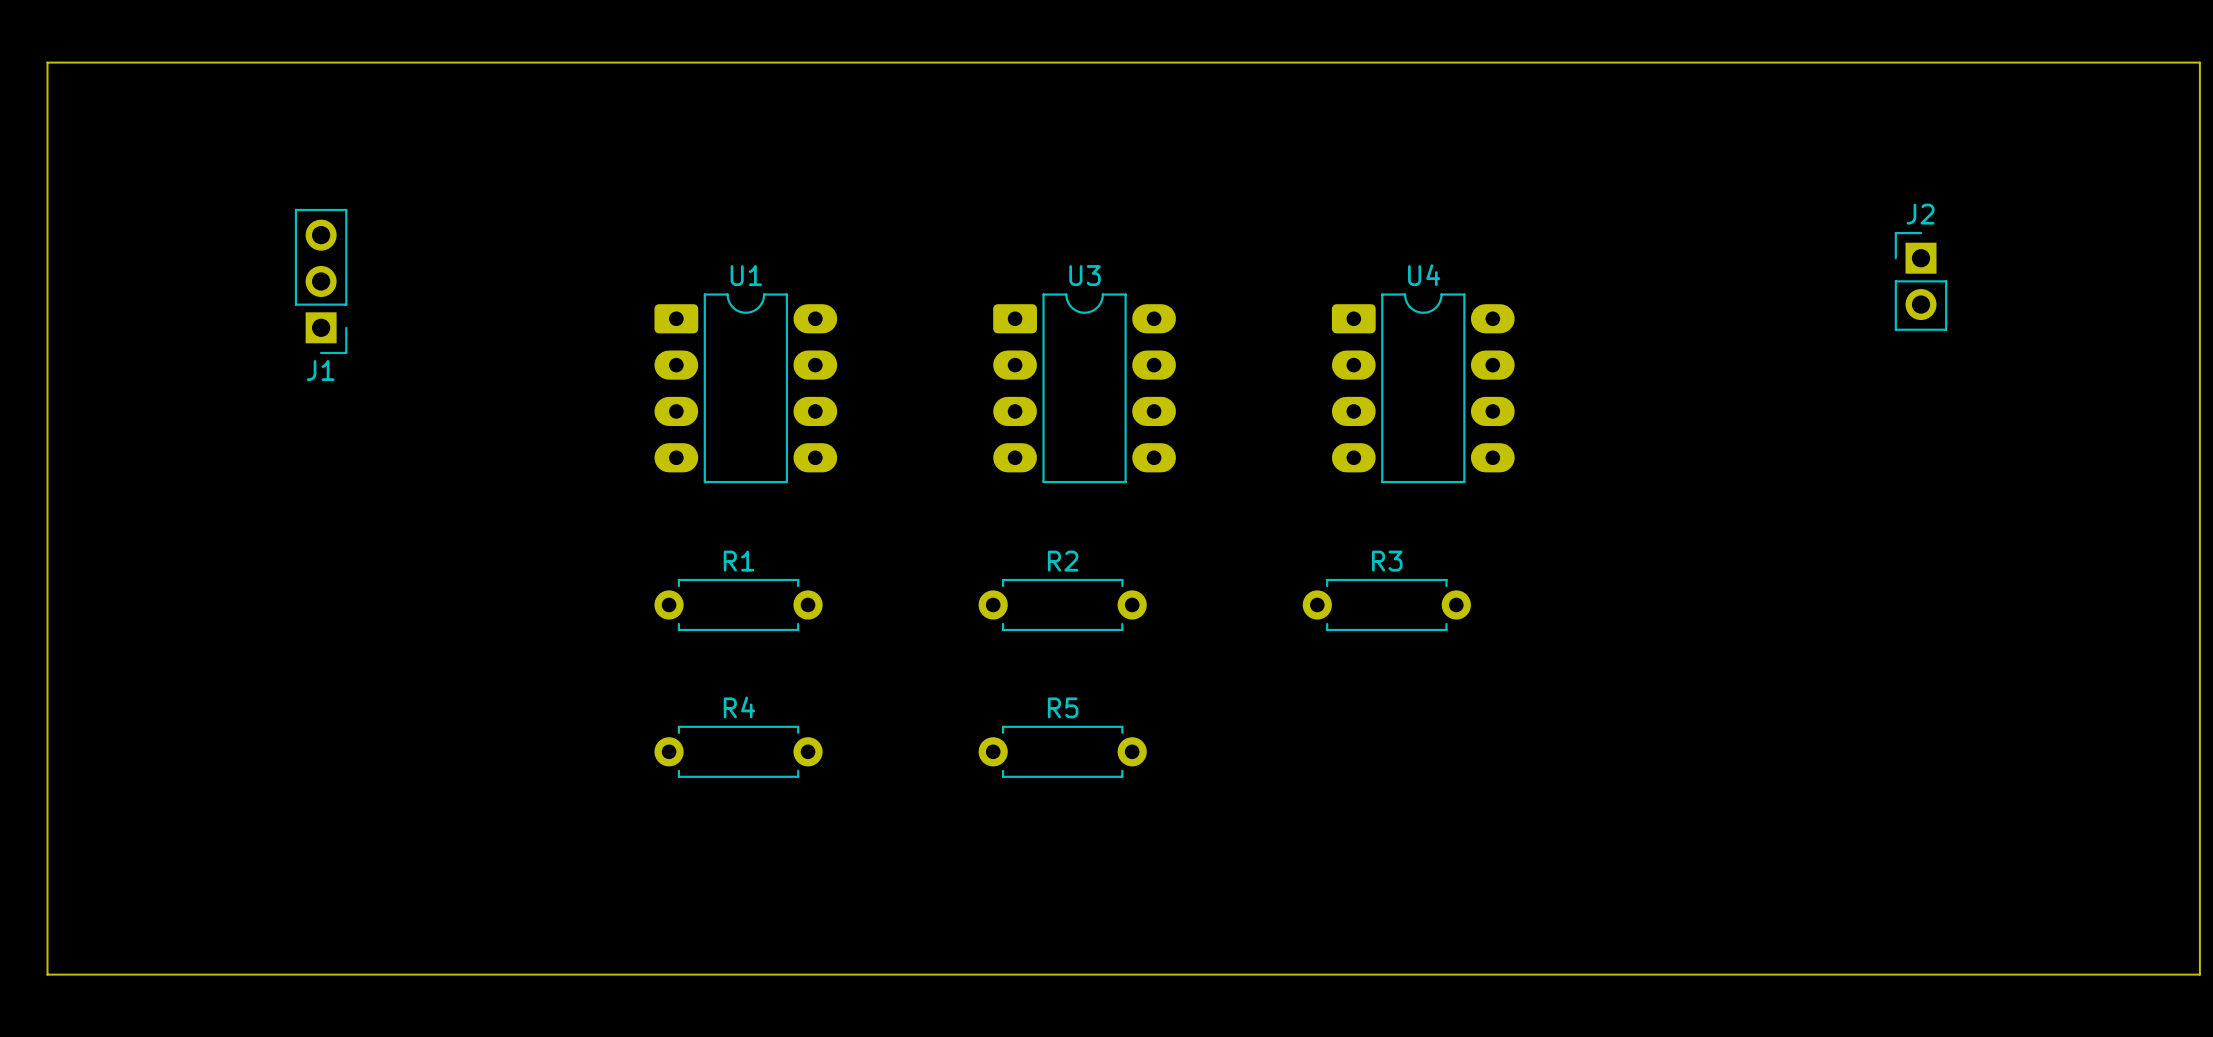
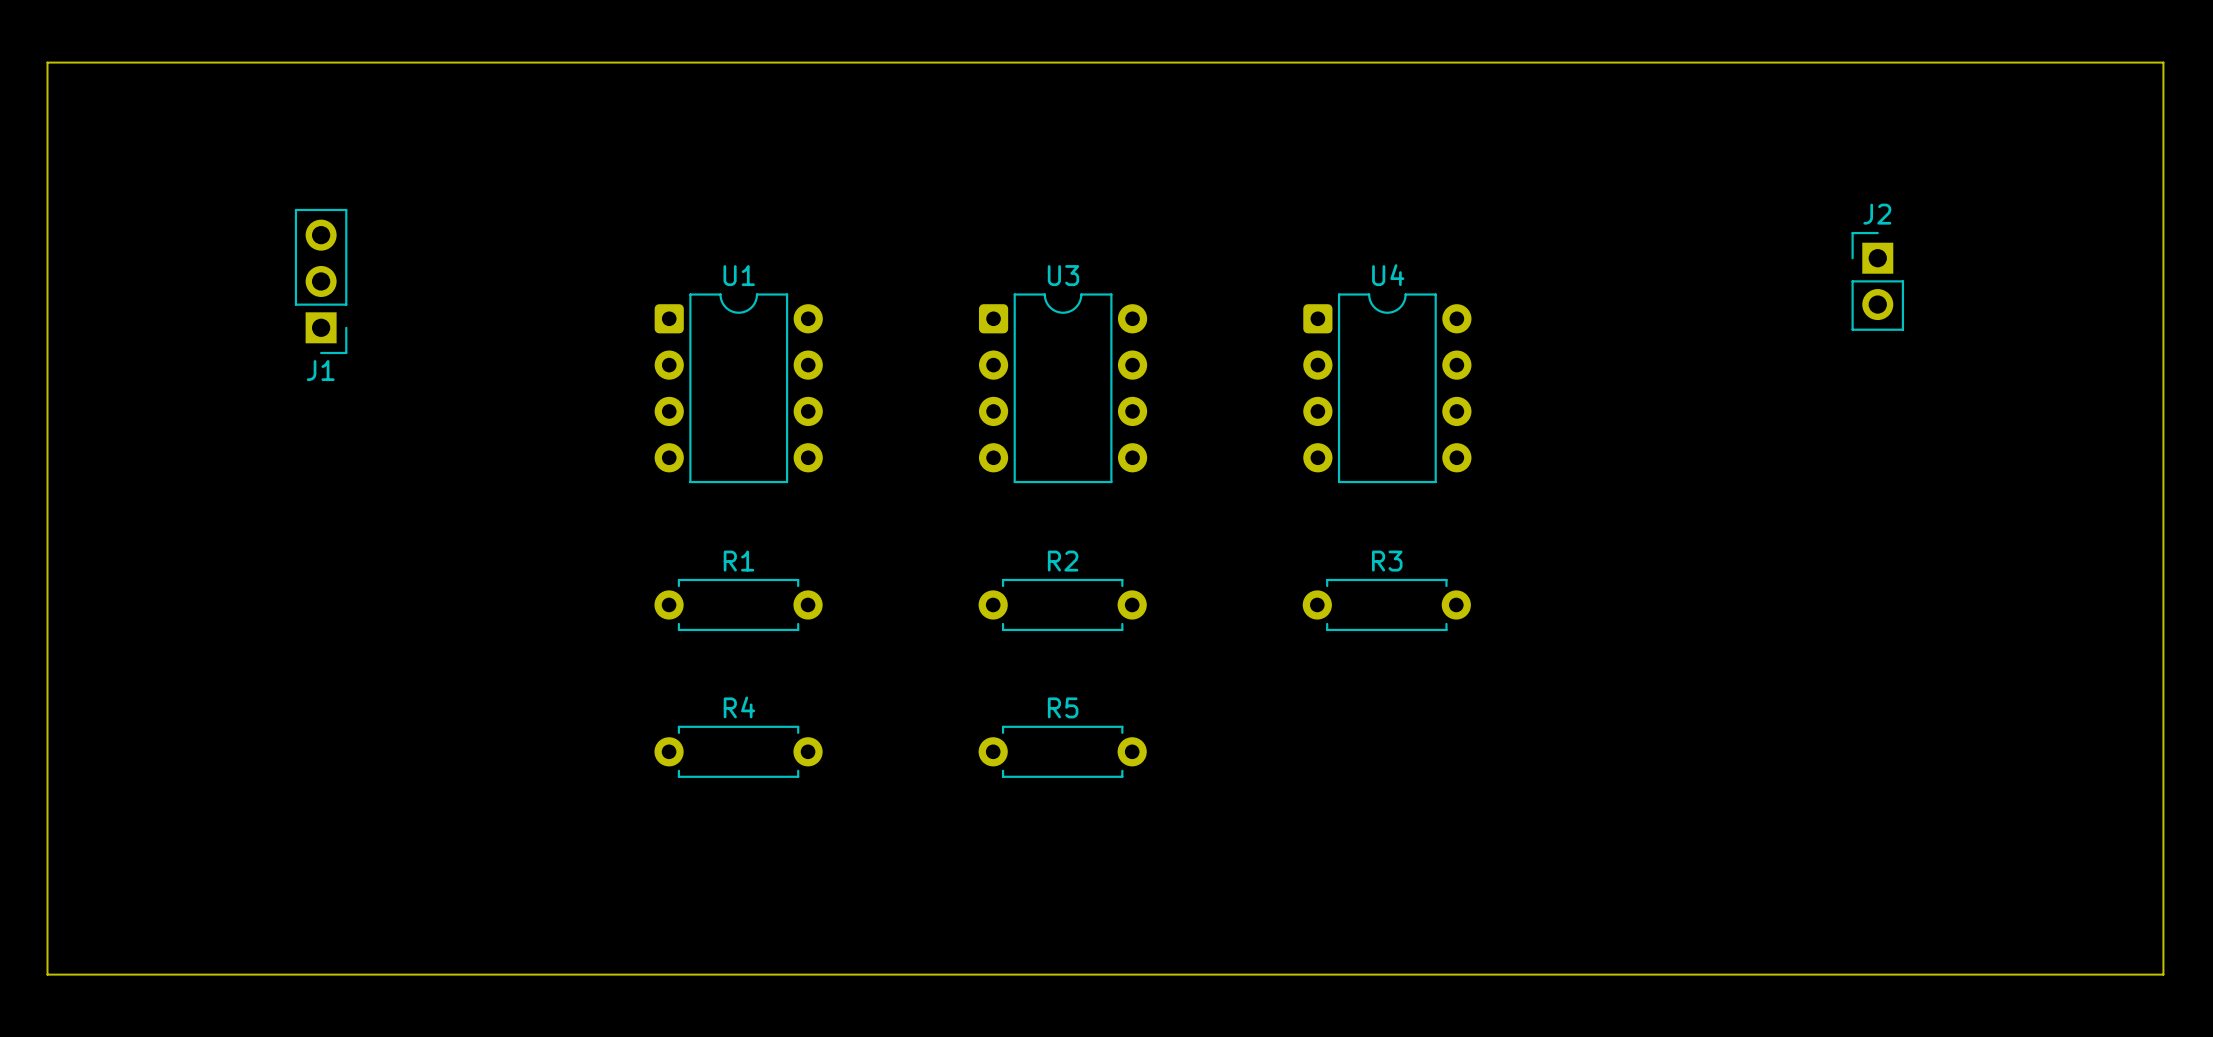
board edge: (2163, 62) (2199, 62) (2199, 974) (2163, 974) -> (2163, 62) (2163, 974)
J2 position: (1921, 281) -> (1877, 281)
U1 footprint: [654, 293, 838, 484] -> [654, 293, 823, 484]
U3 footprint: [993, 293, 1176, 484] -> [978, 293, 1148, 484]
U4 footprint: [1331, 293, 1515, 484] -> [1303, 293, 1472, 484]

